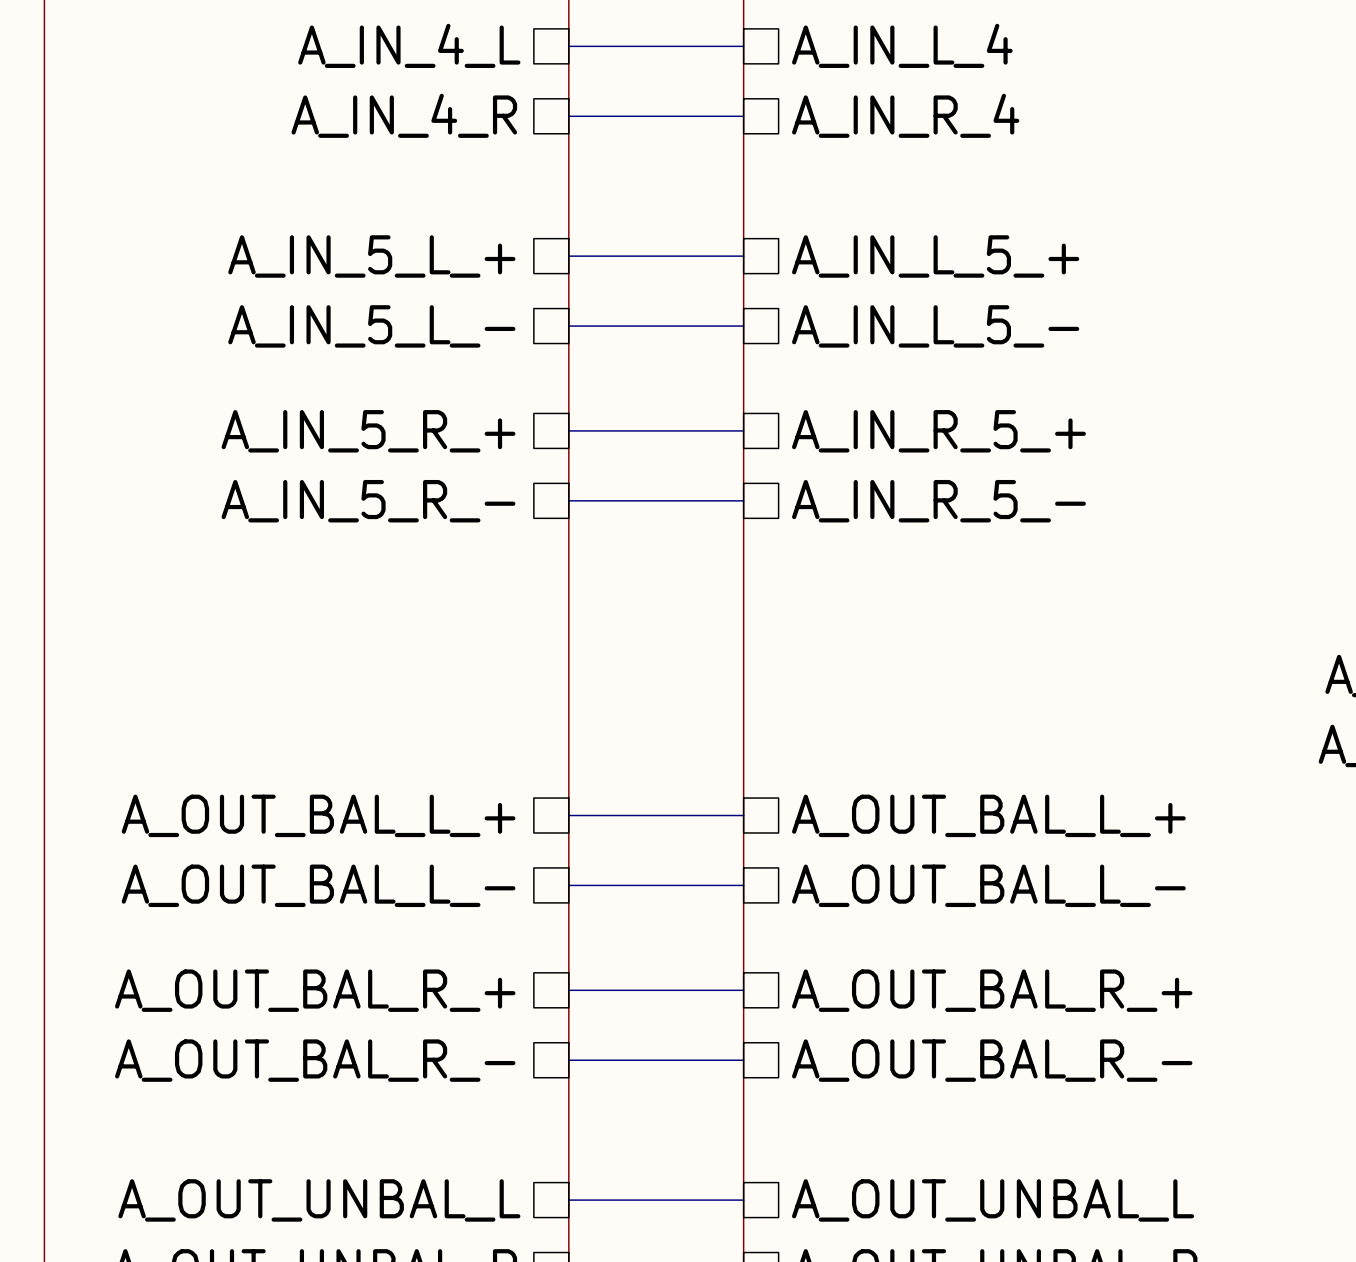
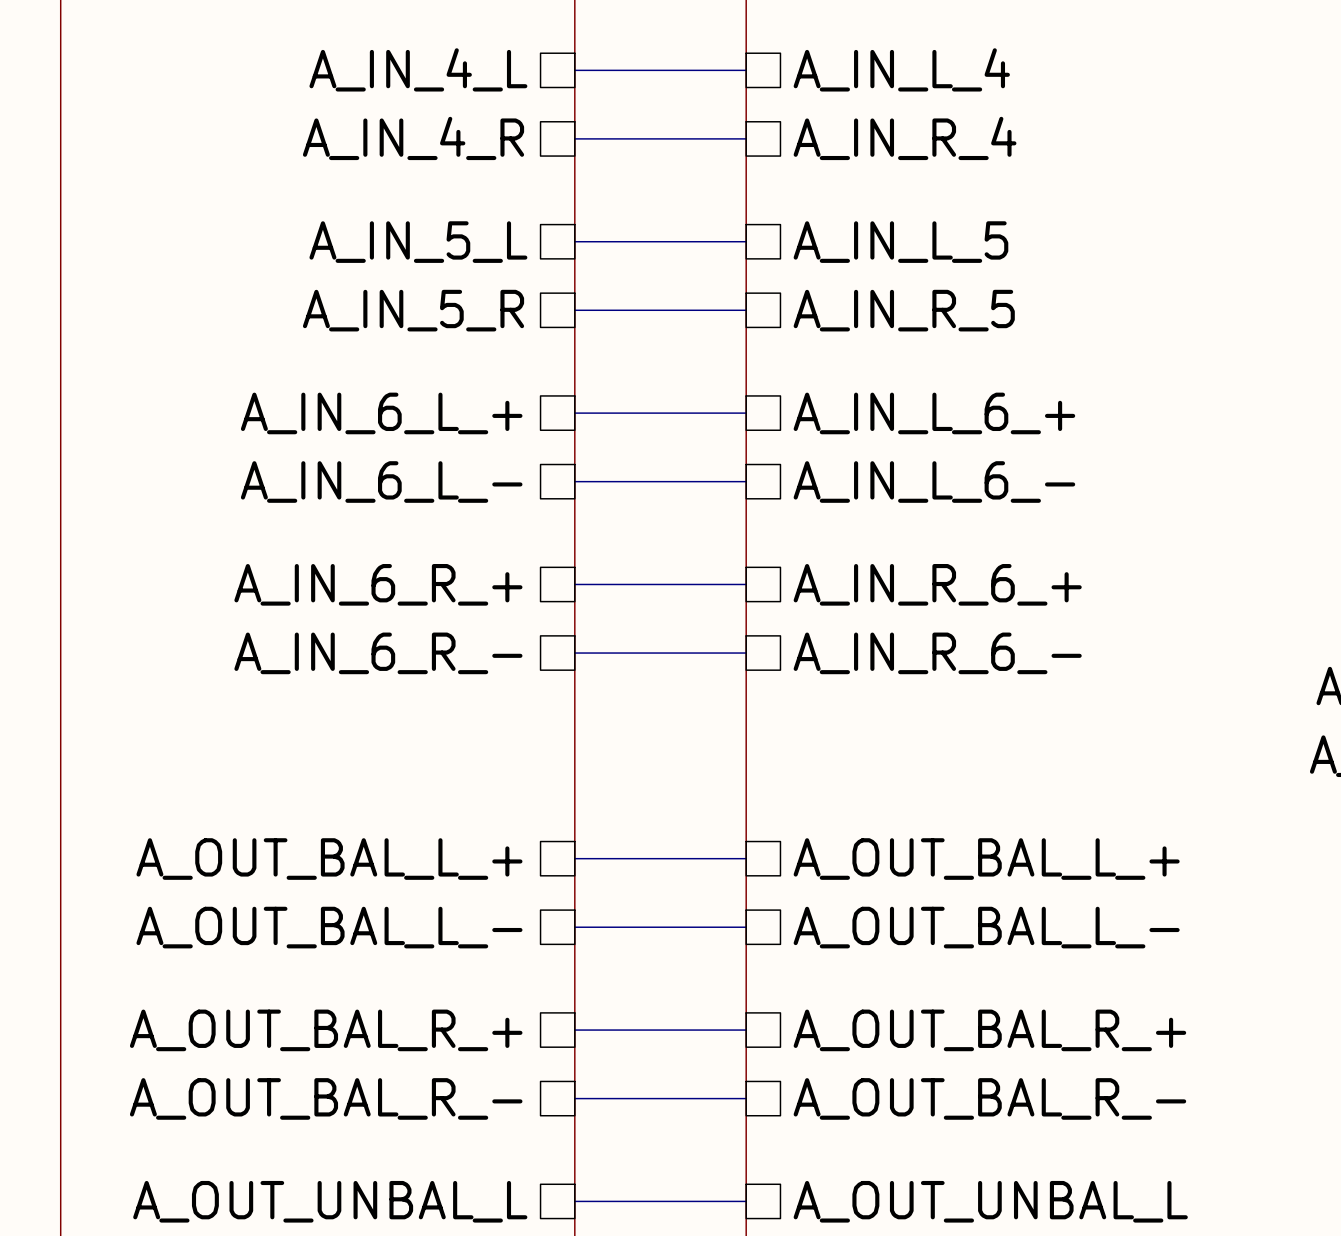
sheet pin: none -> A_IN_5_L (418, 242)
sheet pin: none -> A_IN_L_5 (900, 242)
sheet pin: A_IN_5_L_+ (371, 256) -> none
wire: (568, 256) (743, 256) -> (574, 310) (746, 310)
sheet pin: A_IN_L_5_+ (935, 256) -> none
sheet pin: none -> A_IN_5_R (413, 310)
sheet pin: none -> A_IN_R_5 (904, 310)
sheet pin: A_IN_5_L_- (371, 326) -> none
wire: (568, 326) (743, 326) -> (574, 241) (746, 241)
sheet pin: A_IN_L_5_- (935, 326) -> none
sheet pin: none -> A_IN_6_L_+ (381, 413)
sheet pin: none -> A_IN_L_6_+ (934, 413)
wire: (568, 430) (743, 430) -> (574, 413) (746, 413)
sheet pin: A_IN_5_R_+ (368, 431) -> none
sheet pin: A_IN_R_5_+ (938, 431) -> none
sheet pin: none -> A_IN_6_L_- (381, 482)
sheet pin: none -> A_IN_L_6_- (934, 482)
wire: (568, 500) (743, 500) -> (574, 481) (746, 481)
sheet pin: A_IN_5_R_- (368, 501) -> none
sheet pin: A_IN_R_5_- (938, 501) -> none
wire: none -> (574, 584) (746, 584)
sheet pin: none -> A_IN_6_R_+ (378, 584)
sheet pin: none -> A_IN_R_6_+ (937, 584)
wire: none -> (574, 653) (746, 653)
sheet pin: none -> A_IN_6_R_- (378, 653)
sheet pin: none -> A_IN_R_6_- (937, 653)
sheet pin position: A_OUT_BAL_L_+ (318, 815) -> A_OUT_BAL_L_+ (329, 859)
wire: (568, 815) (743, 815) -> (574, 858) (746, 858)
sheet pin position: A_OUT_BAL_L_+ (988, 815) -> A_OUT_BAL_L_+ (986, 859)
sheet pin position: A_OUT_BAL_L_- (318, 885) -> A_OUT_BAL_L_- (329, 927)
wire: (568, 885) (743, 885) -> (574, 927) (746, 927)
sheet pin position: A_OUT_BAL_L_- (988, 885) -> A_OUT_BAL_L_- (986, 927)
sheet pin position: A_OUT_BAL_R_+ (315, 990) -> A_OUT_BAL_R_+ (326, 1030)
wire: (568, 990) (743, 990) -> (574, 1030) (746, 1030)
sheet pin position: A_OUT_BAL_R_+ (992, 990) -> A_OUT_BAL_R_+ (989, 1030)
sheet pin position: A_OUT_BAL_R_- (315, 1060) -> A_OUT_BAL_R_- (326, 1098)
wire: (568, 1060) (743, 1060) -> (574, 1098) (746, 1098)
sheet pin position: A_OUT_BAL_R_- (992, 1060) -> A_OUT_BAL_R_- (989, 1098)

